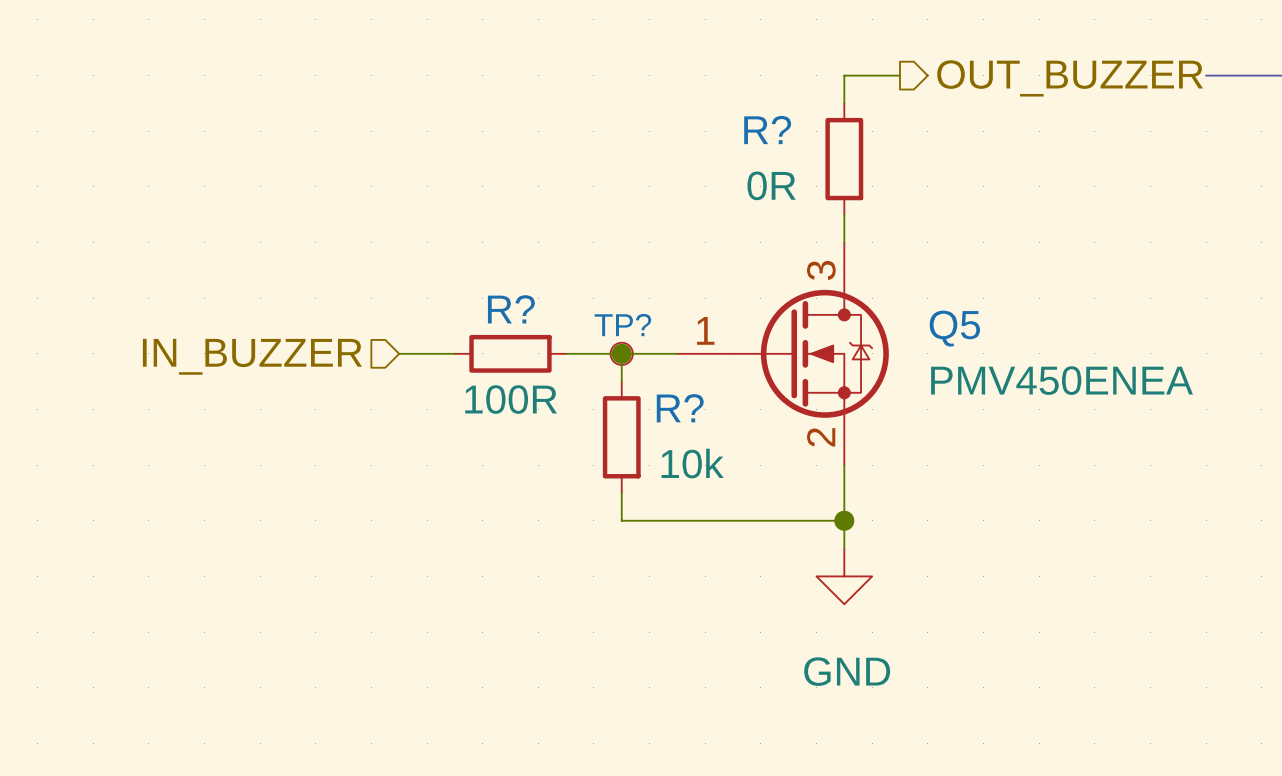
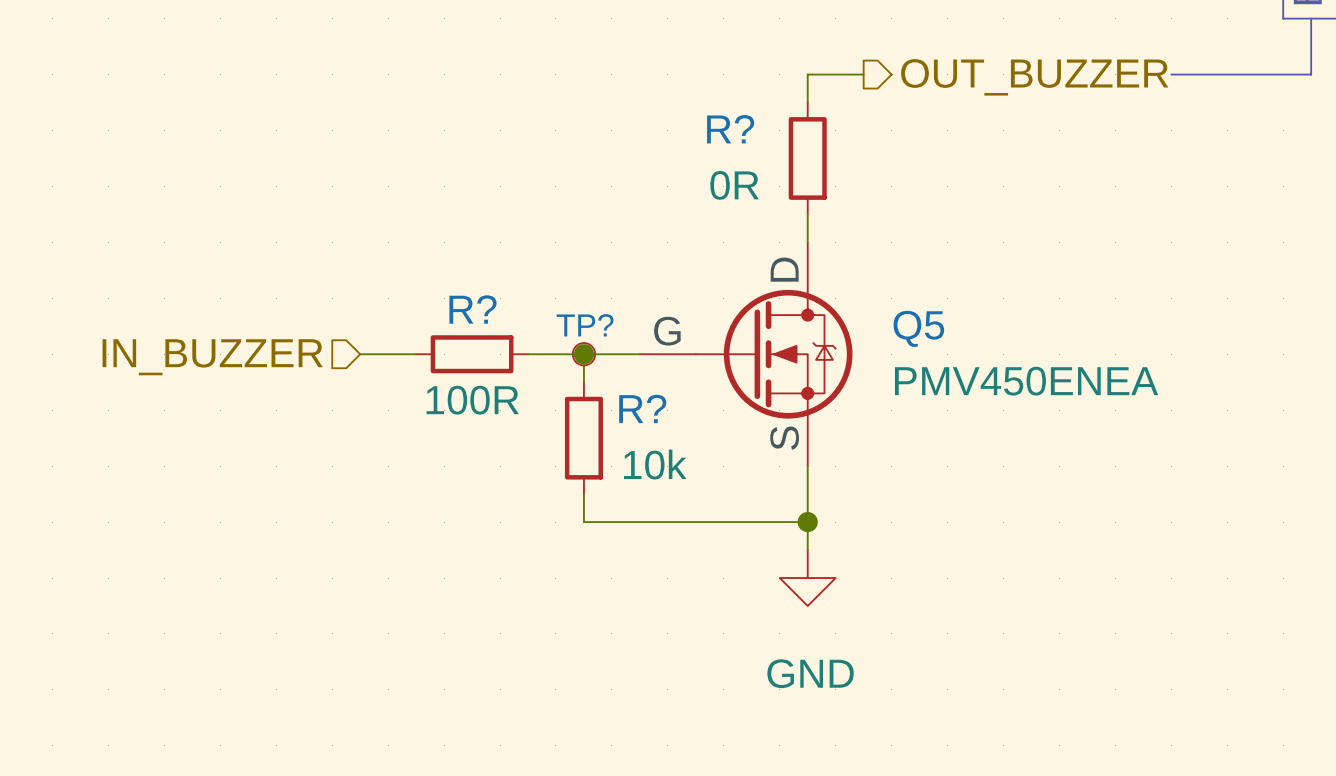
Q5 pin name: none -> D (784, 269)
Q5 pin number: 3 (821, 270) -> none
Q5 pin name: none -> G (667, 331)
Q5 pin number: 1 (705, 330) -> none
Q5 pin name: none -> S (784, 438)
Q5 pin number: 2 (821, 437) -> none

